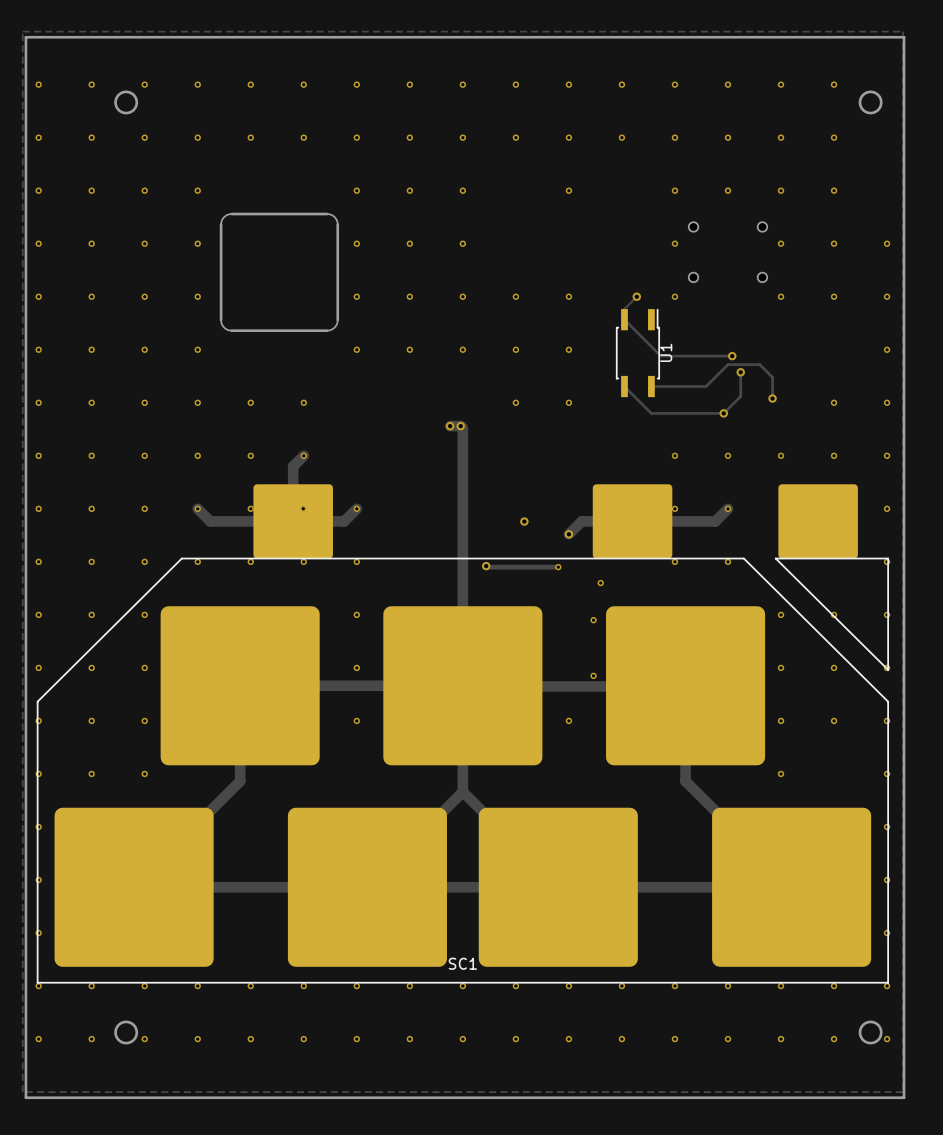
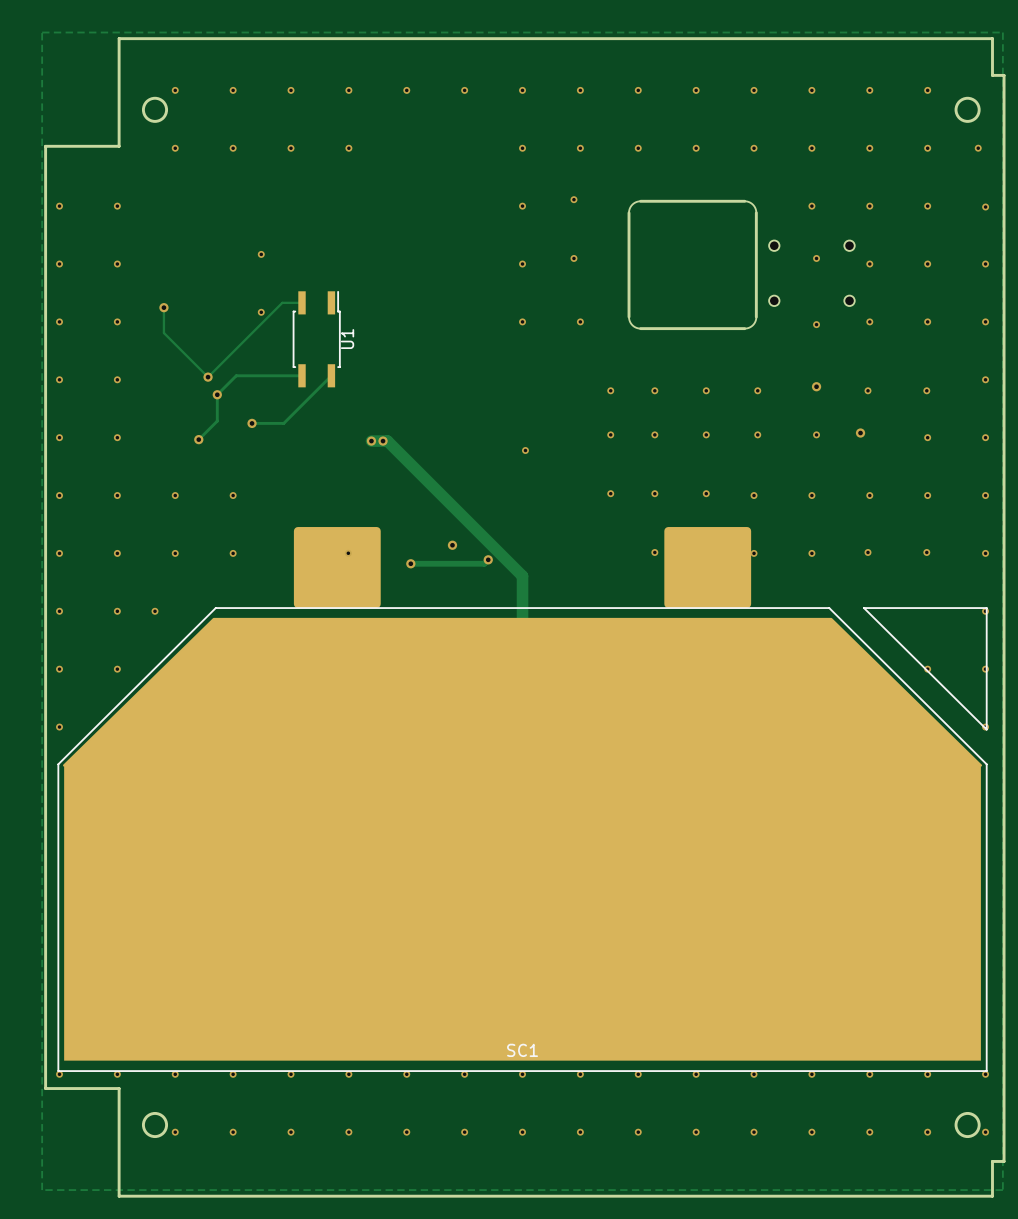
drawing shape: [24, 35, 906, 1100] -> [44, 37, 1006, 1198]
via: (38, 84) -> none
via: (91, 84) -> none
via: (38, 137) -> none
via: (91, 137) -> none
via: (356, 137) -> none
via: (409, 137) -> none
via: none -> (978, 148)
via: none -> (573, 199)
via: (144, 190) -> none
via: (197, 190) -> none
via: (356, 190) -> none
via: (409, 190) -> none
via: (568, 190) -> none
via: (674, 190) -> none
via: none -> (985, 207)
via: none -> (261, 254)
via: none -> (573, 258)
via: none -> (816, 258)
via: (144, 243) -> none
via: (197, 243) -> none
via: (356, 243) -> none
via: (409, 243) -> none
via: (674, 243) -> none
track: none -> (302, 302) (282, 302) (208, 377) (163, 333) (163, 307)
via: none -> (163, 307)
via: none -> (261, 312)
via: (144, 296) -> none
via: (197, 296) -> none
via: (356, 296) -> none
via: (409, 296) -> none
via: (568, 296) -> none
track: (636, 296) (624, 309) (624, 319) (660, 356) (732, 356) -> none
via: (636, 296) -> none
via: (674, 296) -> none
via: none -> (816, 324)
track: none -> (302, 375) (236, 375) (217, 394) (217, 420)
track: none -> (331, 375) (283, 423) (252, 423)
via: none -> (208, 377)
via: (144, 349) -> none
via: (197, 349) -> none
via: (356, 349) -> none
via: (409, 349) -> none
via: (462, 349) -> none
via: (515, 349) -> none
via: (568, 349) -> none
U1 position: (637, 353) -> (316, 339)
via: none -> (610, 390)
via: none -> (654, 390)
via: none -> (706, 390)
via: none -> (757, 390)
via: none -> (867, 390)
via: none -> (926, 390)
via: none -> (217, 394)
track: (740, 372) (740, 396) -> none
via: (740, 372) -> none
track: (624, 386) (651, 413) (723, 413) (740, 396) -> none
track: (651, 386) (706, 386) (727, 364) (759, 364) (772, 377) (772, 398) -> none
track: none -> (217, 421) (198, 439)
via: none -> (252, 423)
via: none -> (610, 434)
via: none -> (654, 434)
via: none -> (706, 434)
via: none -> (757, 434)
via: none -> (816, 434)
via: (144, 402) -> none
via: (197, 402) -> none
via: (250, 402) -> none
via: (303, 402) -> none
via: (515, 402) -> none
via: (568, 402) -> none
via: none -> (198, 439)
via: none -> (371, 441)
via: none -> (383, 441)
via: (723, 413) -> none
via: none -> (525, 450)
track: (450, 426) (460, 426) (462, 428) (462, 529) -> (371, 441) (387, 441) (522, 576)
via: (450, 426) -> none
via: (460, 426) -> none
via: none -> (610, 493)
via: none -> (654, 493)
via: none -> (706, 493)
via: (250, 455) -> none
track: (303, 455) (293, 466) (293, 521) -> none
via: (303, 455) -> none
SC1 footprint: [36, 484, 889, 984] -> [57, 527, 988, 1072]
via: none -> (452, 545)
via: none -> (654, 552)
via: none -> (867, 552)
via: none -> (926, 552)
track: (197, 508) (210, 521) (344, 521) (356, 508) -> none
via: (250, 508) -> none
via: (356, 508) -> none
track: (727, 508) (715, 521) (581, 521) (568, 534) -> none
track: none -> (488, 559) (484, 563) (410, 563)
via: none -> (488, 559)
via: none -> (410, 563)
via: (524, 521) -> none
via: (568, 534) -> none
via position: (144, 561) -> (155, 611)
via: (197, 561) -> none
via: (250, 561) -> none
via: (303, 561) -> none
via: (356, 561) -> none
via: (674, 561) -> none
via: (727, 561) -> none
track: (486, 566) (558, 567) -> none
via: (486, 566) -> none
via: (558, 567) -> none
via: (600, 583) -> none
via: (144, 614) -> none
via: (356, 614) -> none
via: (781, 614) -> none
via: (593, 620) -> none
via: (91, 667) -> none
via: (144, 667) -> none
via: (356, 667) -> none
via: (781, 667) -> none
via: (834, 667) -> none
via: (593, 675) -> none
via: (38, 720) -> none
via: (91, 720) -> none
via: (144, 720) -> none
via: (356, 720) -> none
via: (568, 720) -> none
via: (781, 720) -> none
via: (834, 720) -> none
via: (887, 720) -> none
via: (38, 773) -> none
via: (91, 773) -> none
via: (144, 773) -> none
via: (781, 773) -> none
via: (887, 773) -> none
via: (38, 826) -> none
via: (887, 826) -> none
via: (38, 880) -> none
via: (887, 880) -> none
via: (38, 933) -> none
via: (887, 933) -> none
via: (38, 1039) -> none
via: (91, 1039) -> none

